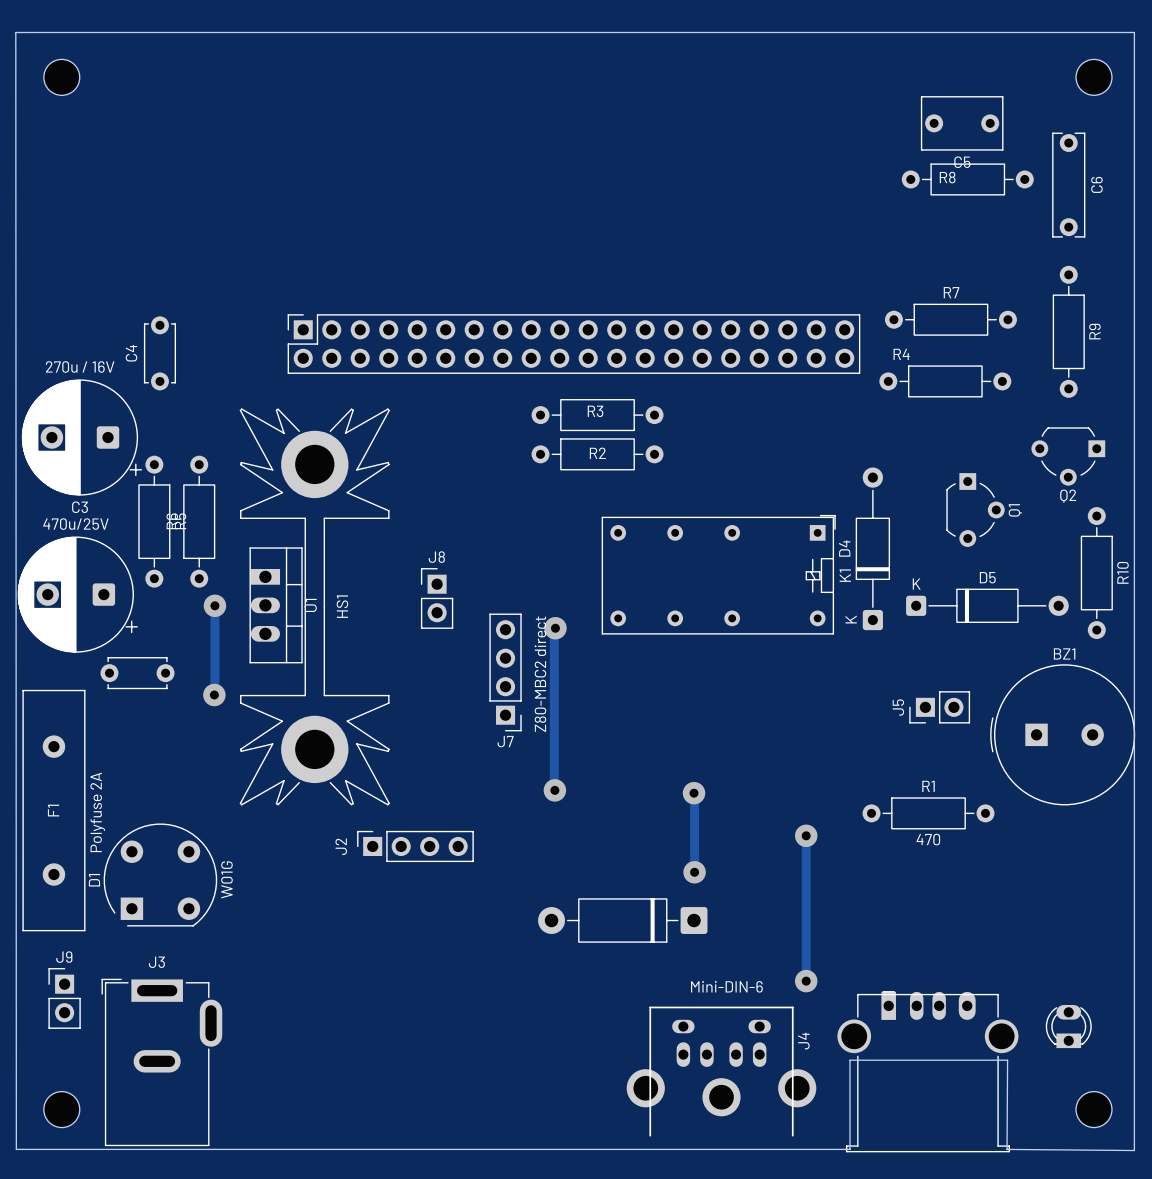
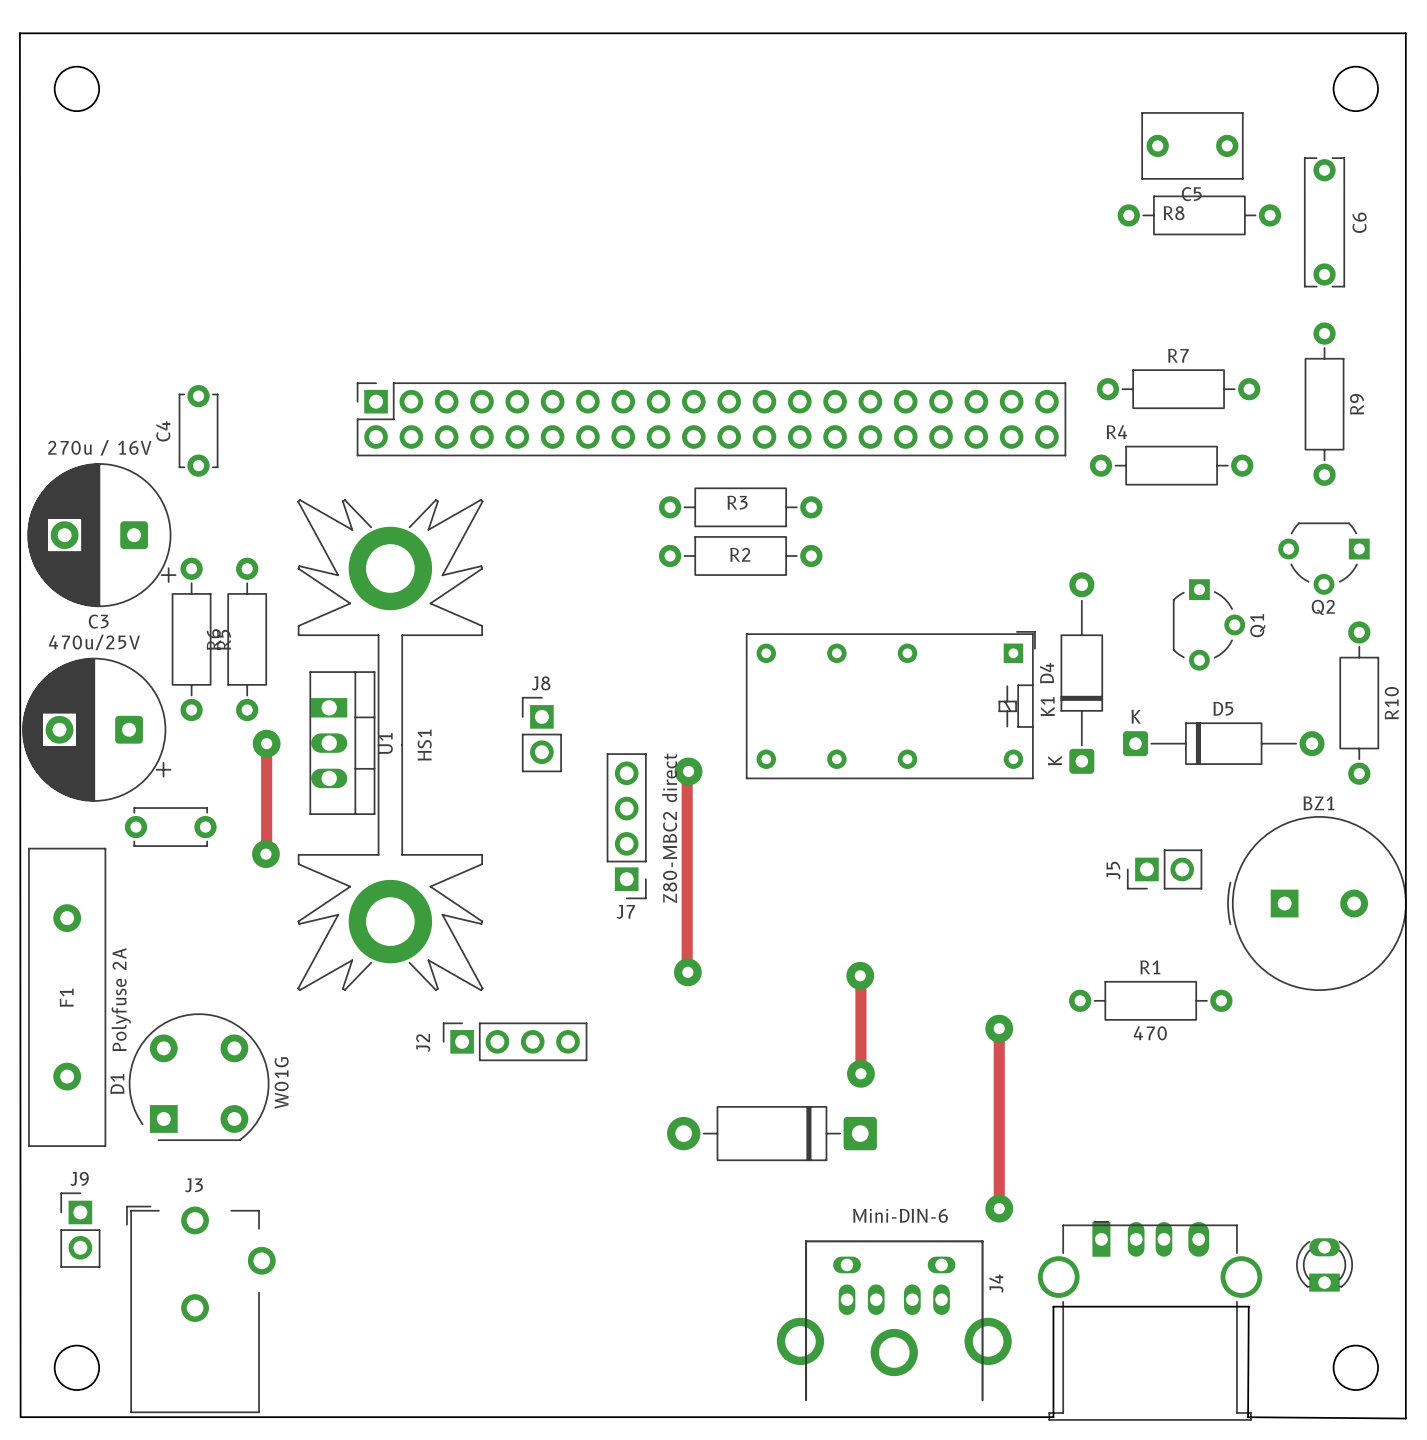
J3 footprint: [101, 978, 223, 1147] -> [126, 1205, 276, 1414]

